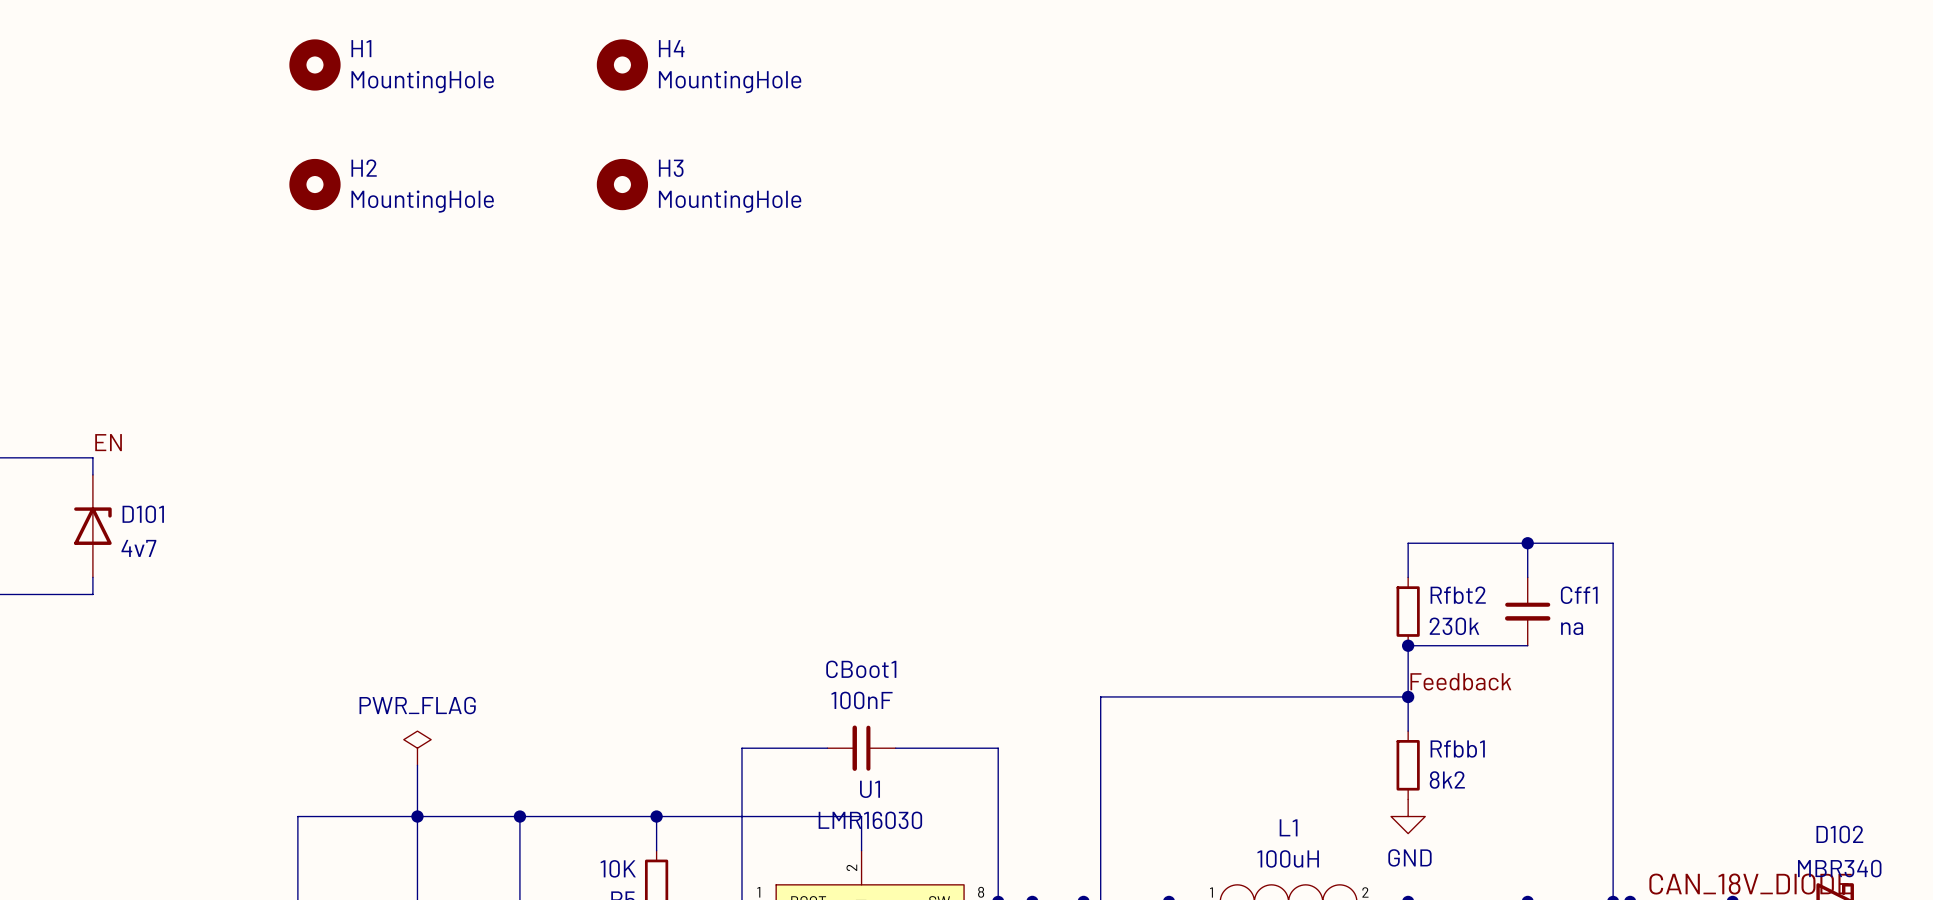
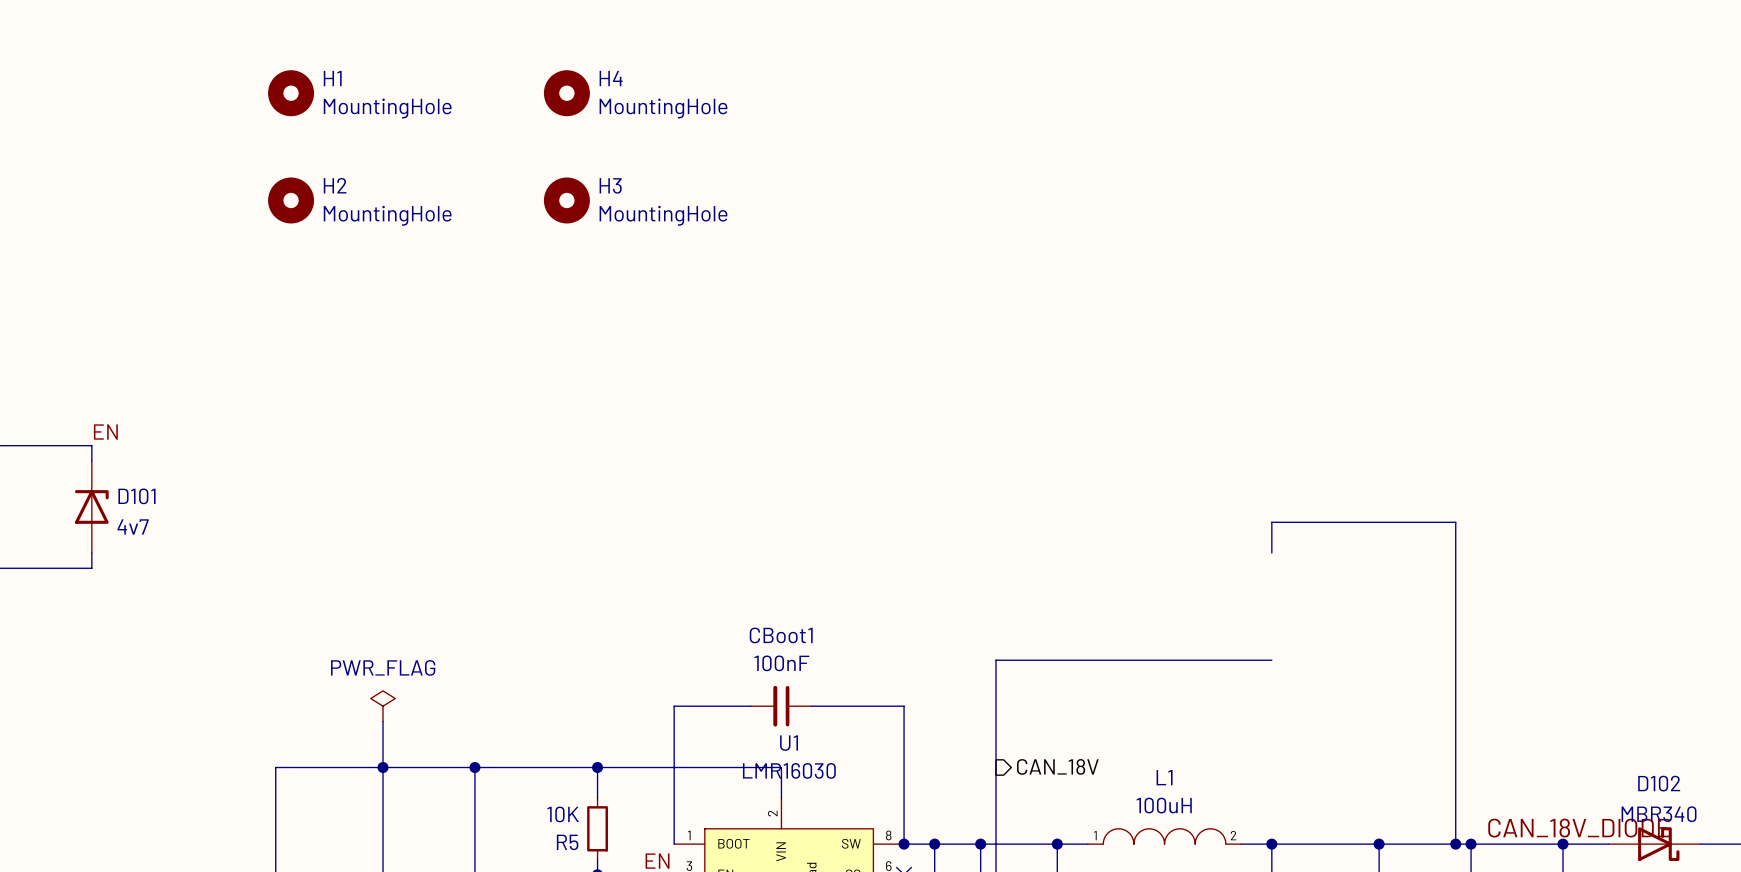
wire: (1527, 543) (1527, 577) -> none
junction: (1527, 543) -> none
Rfbt2: 230k (1408, 611) -> none
Cff1: na (1527, 611) -> none
junction: (1408, 645) -> none
wire: (1527, 645) (1408, 645) (1408, 731) -> none
label: Feedback (1460, 681) -> none
junction: (1408, 696) -> none
Rfbb1: 8k2 (1408, 765) -> none
sheet pin: none -> CAN_18V (1057, 766)
power symbol: GND (1408, 816) -> none

